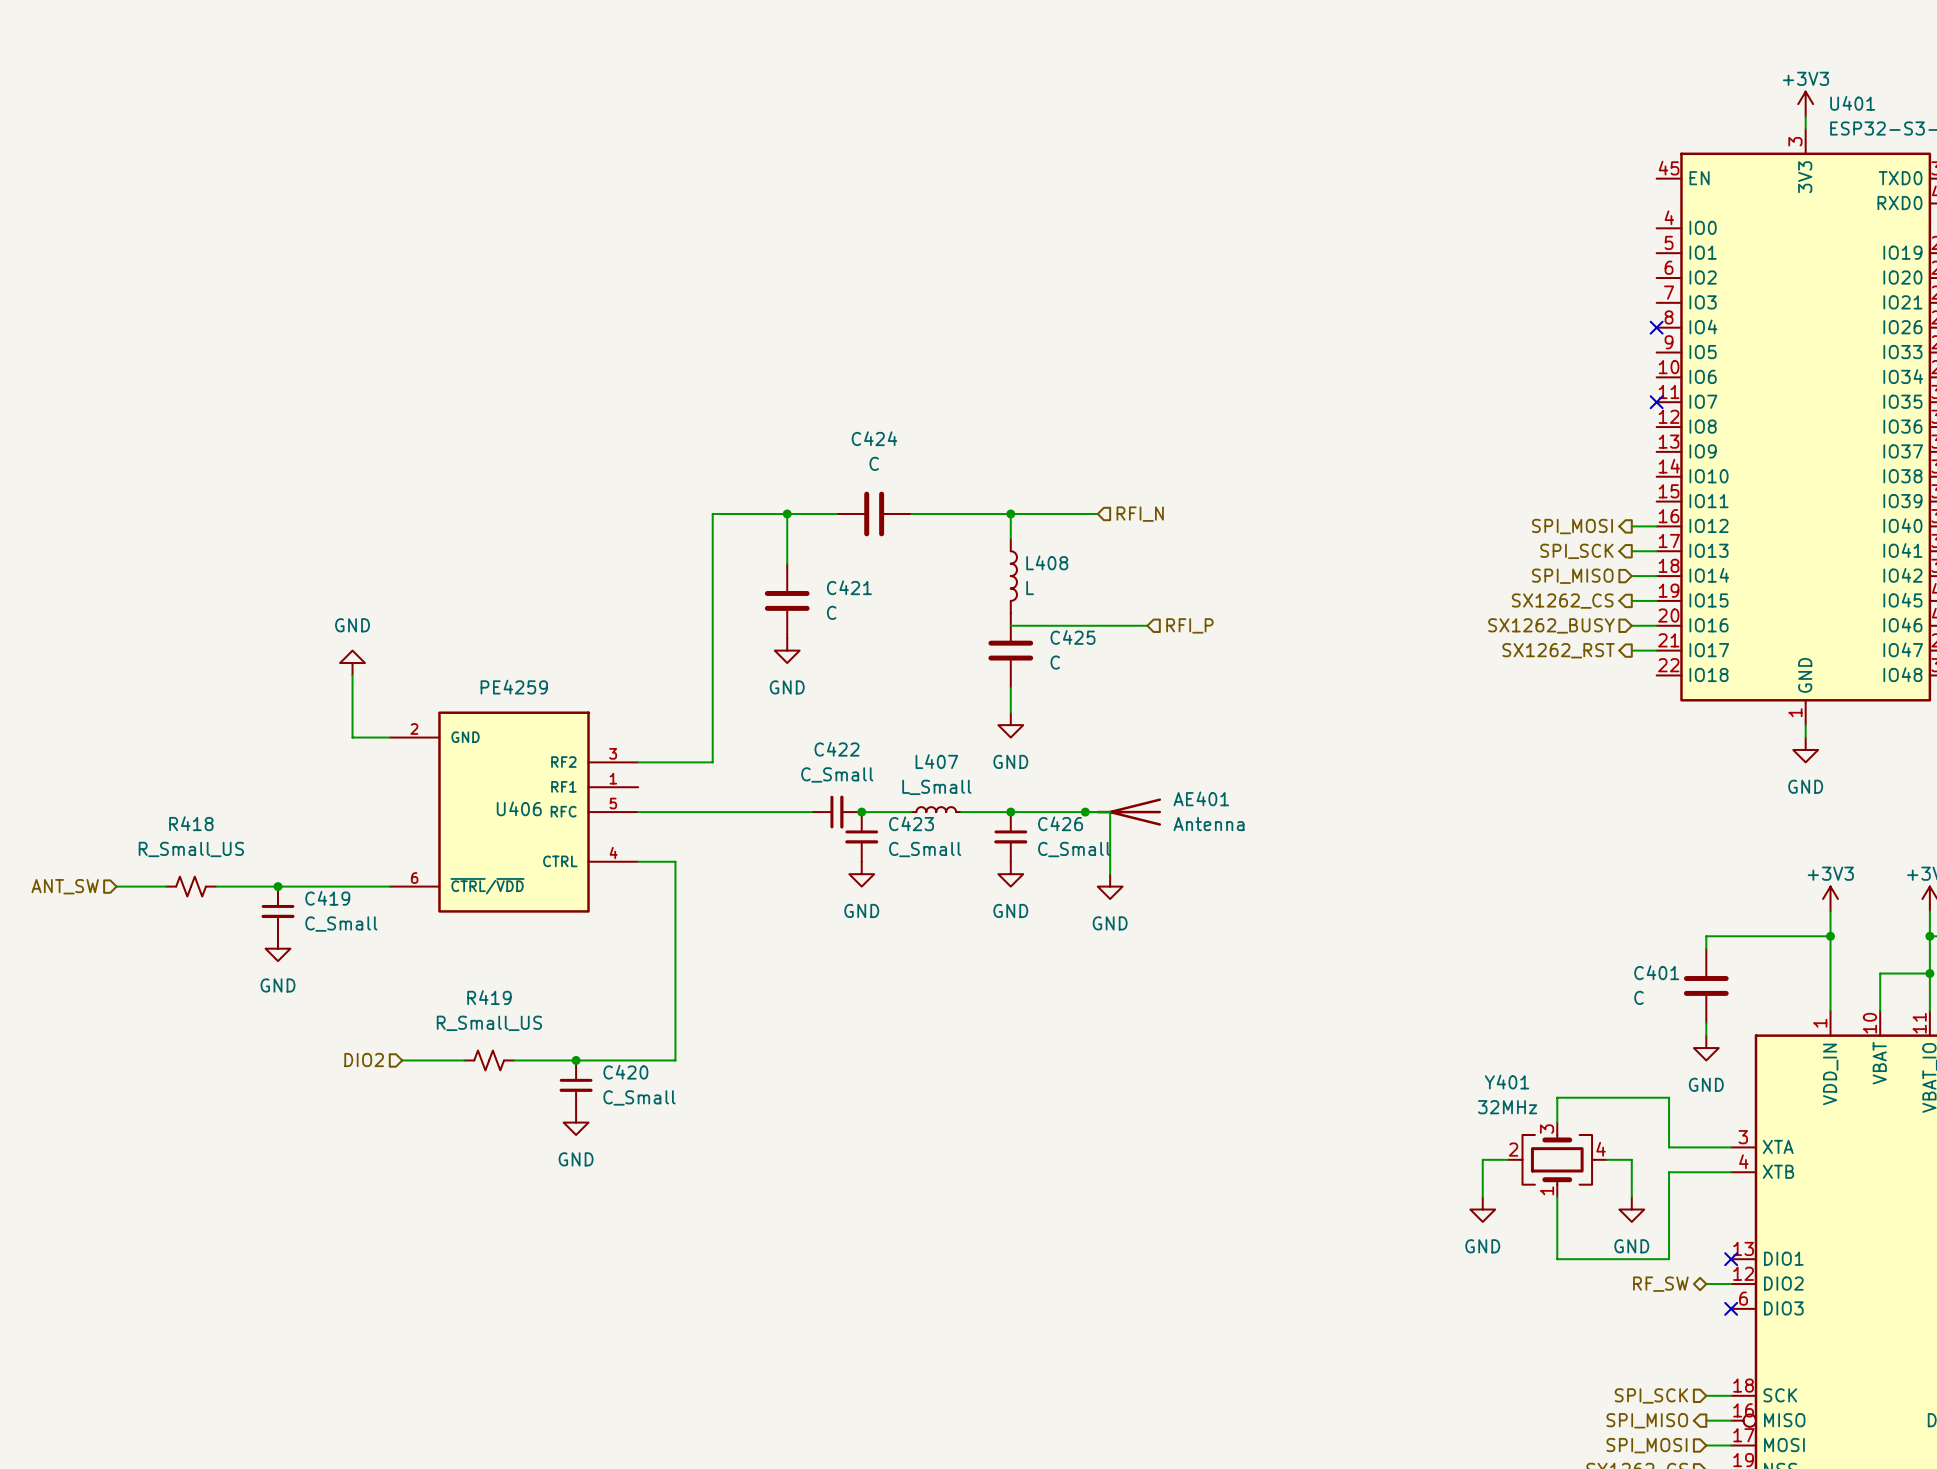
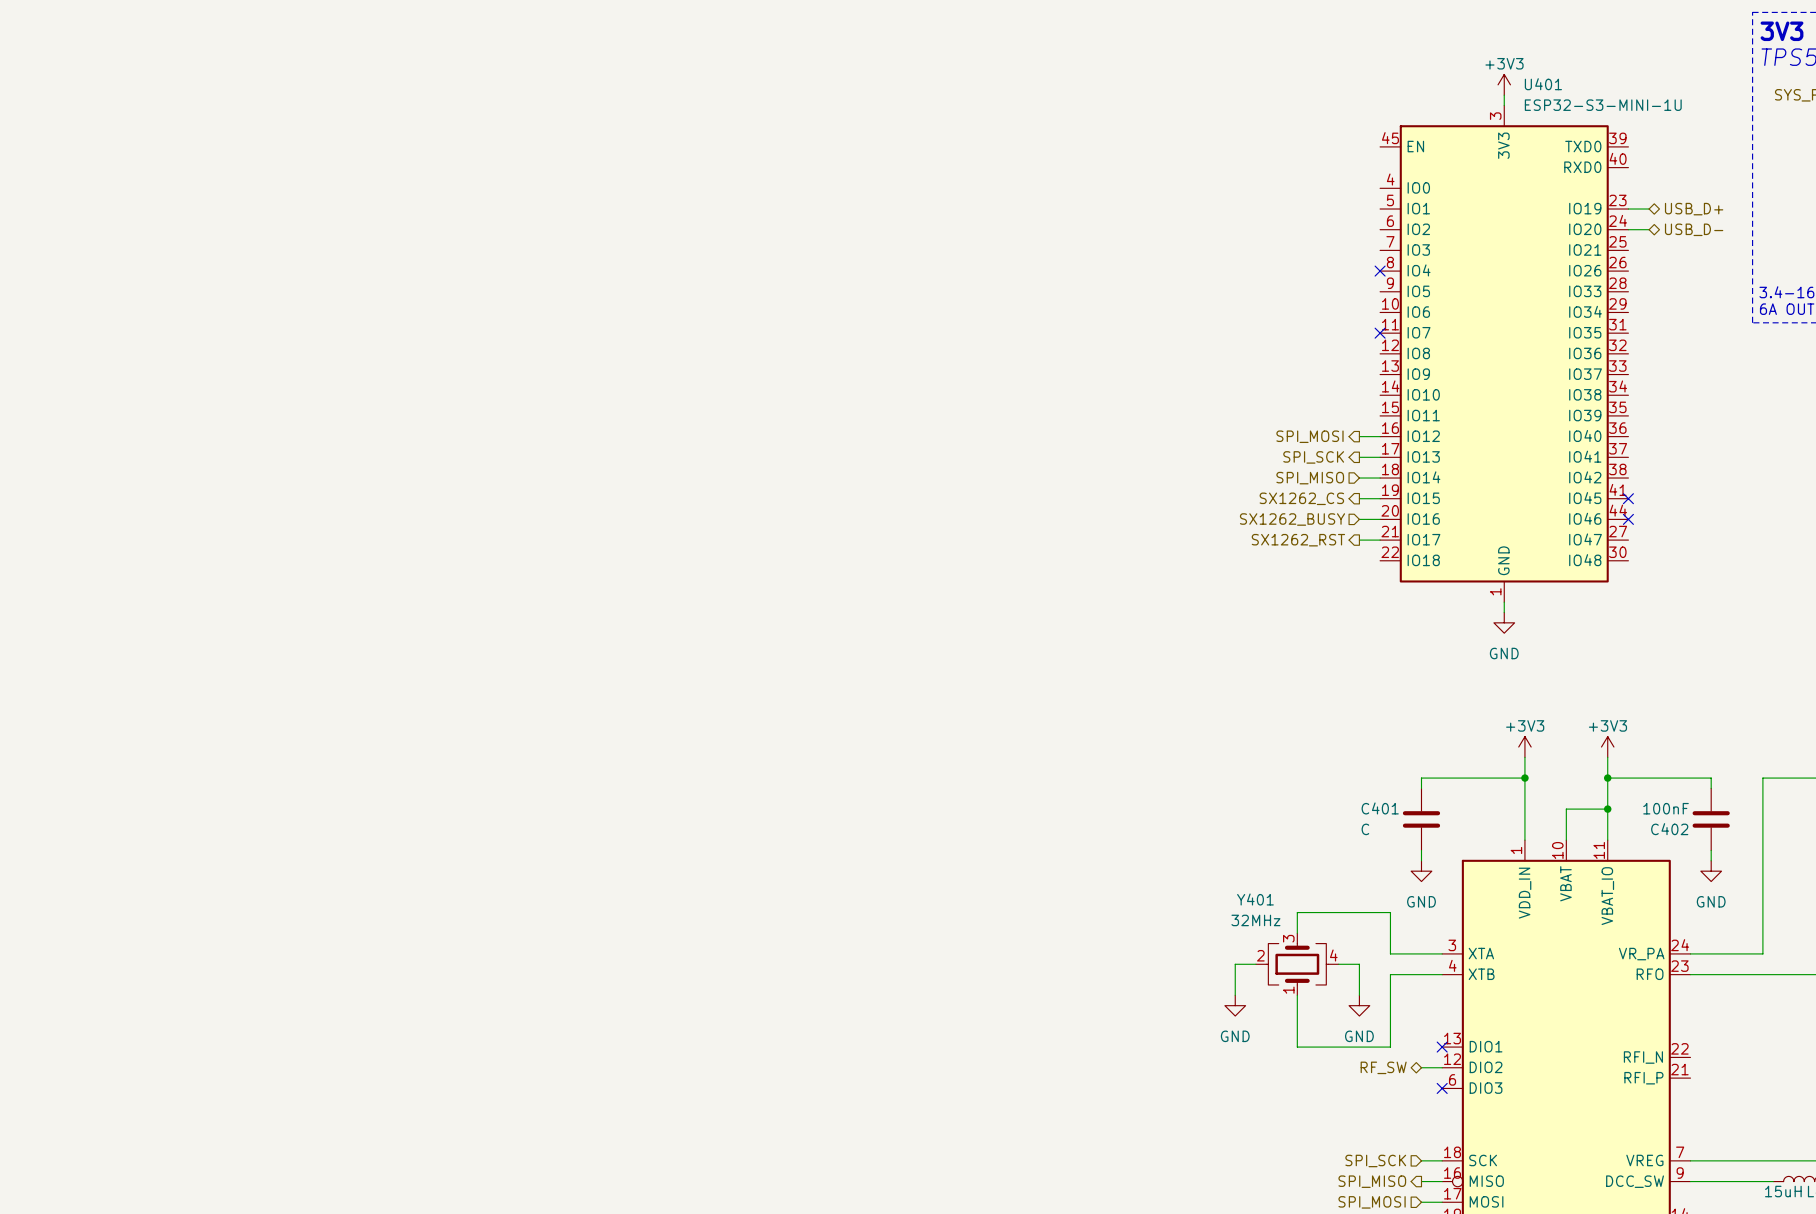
wire: (787, 513) (787, 563) -> none
junction: (787, 513) -> none
wire: (836, 513) (712, 513) (712, 762) (638, 762) -> none
C424: C (874, 513) -> none
wire: (911, 513) (1097, 513) -> none
wire: (1010, 513) (1010, 538) -> none
junction: (1010, 513) -> none
hierarchical label: RFI_N (1140, 514) -> none
L408: L (1013, 576) -> none
C421: C (787, 600) -> none
wire: (1010, 625) (1147, 625) -> none
hierarchical label: RFI_P (1189, 625) -> none
power symbol: GND (787, 650) -> none
C425: C (1010, 650) -> none
power symbol: GND (352, 663) -> none
wire: (352, 675) (352, 737) (389, 737) -> none
wire: (1010, 687) (1010, 712) -> none
power symbol: GND (1010, 725) -> none
L407: L_Small (936, 809) -> none
U406: PE4259 (513, 812) -> none
wire: (638, 812) (812, 812) -> none
C422: C_Small (836, 812) -> none
wire: (861, 812) (911, 812) -> none
junction: (861, 812) -> none
wire: (961, 812) (1110, 812) (1110, 874) -> none
junction: (1010, 812) -> none
junction: (1085, 812) -> none
AE401: Antenna (1123, 812) -> none
C423: C_Small (861, 836) -> none
C426: C_Small (1010, 836) -> none
wire: (638, 861) (675, 861) (675, 1060) (513, 1060) -> none
power symbol: GND (861, 874) -> none
power symbol: GND (1010, 874) -> none
hierarchical label: ANT_SW (65, 886) -> none
wire: (116, 886) (166, 886) -> none
R418: R_Small_US (191, 886) -> none
wire: (215, 886) (389, 886) -> none
junction: (278, 886) -> none
power symbol: GND (1110, 886) -> none
C419: C_Small (278, 911) -> none
power symbol: GND (278, 948) -> none
hierarchical label: DIO2 (364, 1060) -> none
wire: (402, 1060) (464, 1060) -> none
R419: R_Small_US (489, 1060) -> none
junction: (576, 1060) -> none
C420: C_Small (576, 1085) -> none
power symbol: GND (576, 1122) -> none

